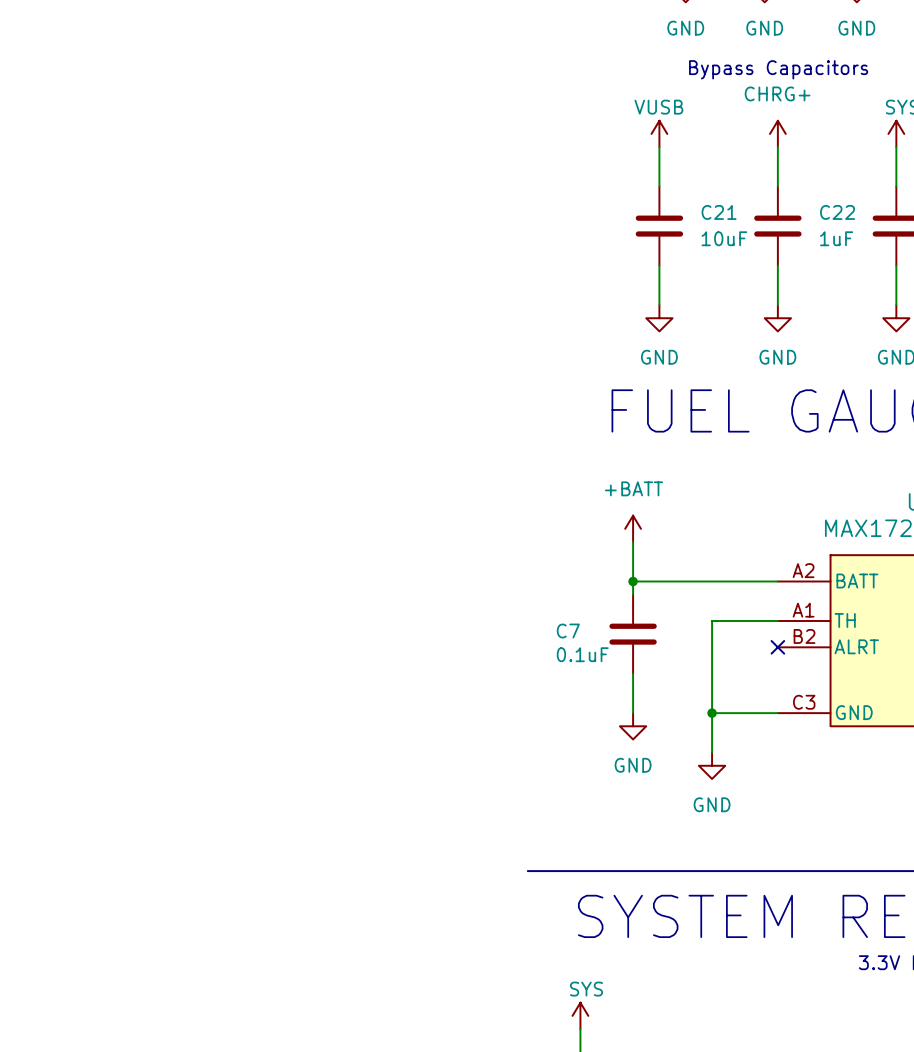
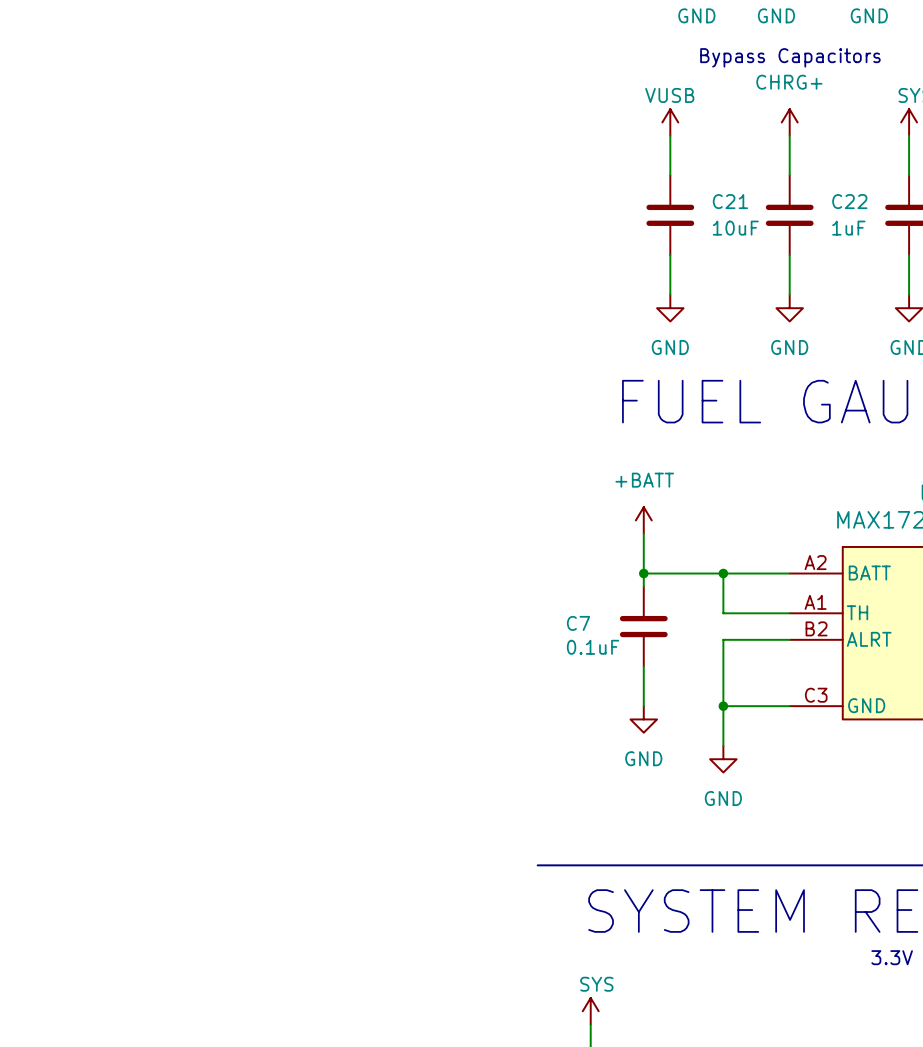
junction: none -> (723, 573)
wire: (712, 620) (712, 647) -> (723, 613) (723, 573)
wire: none -> (723, 639) (789, 639)
no-connect mark: (777, 647) -> none

